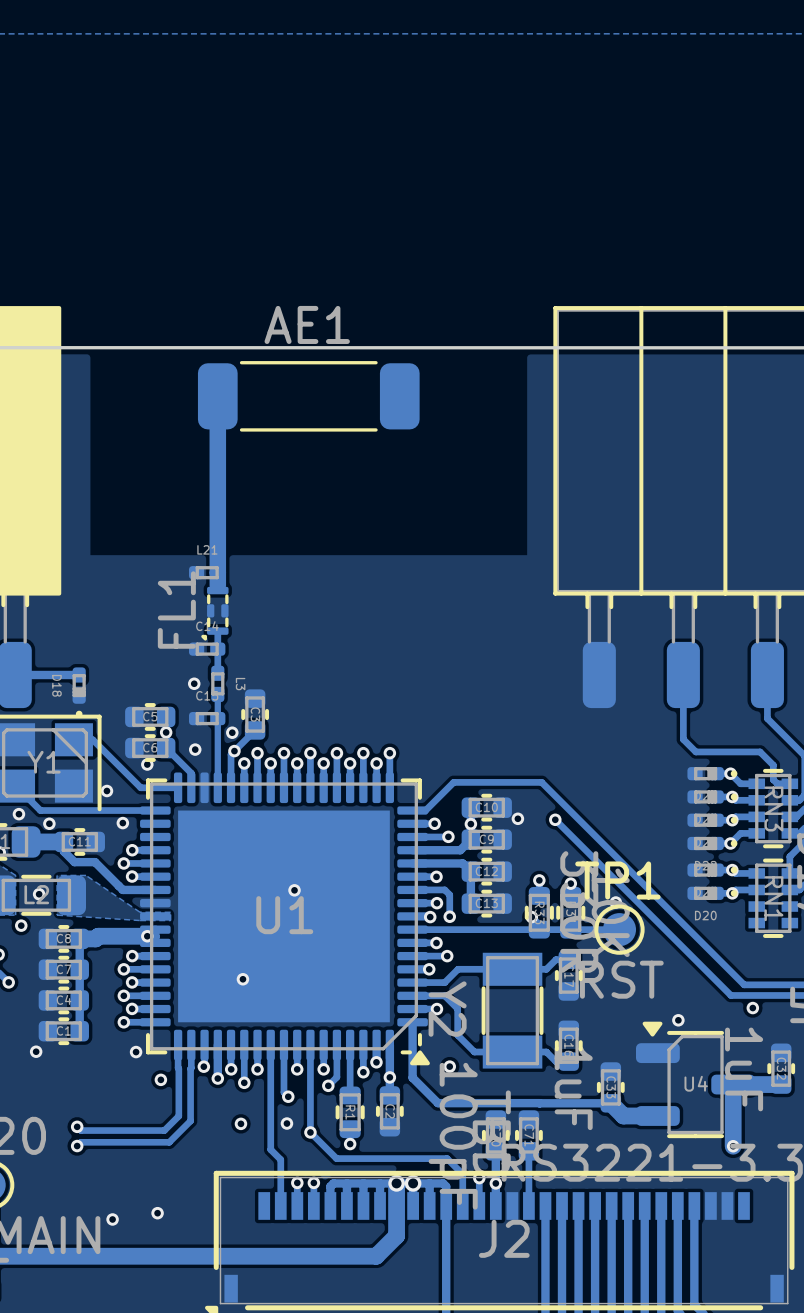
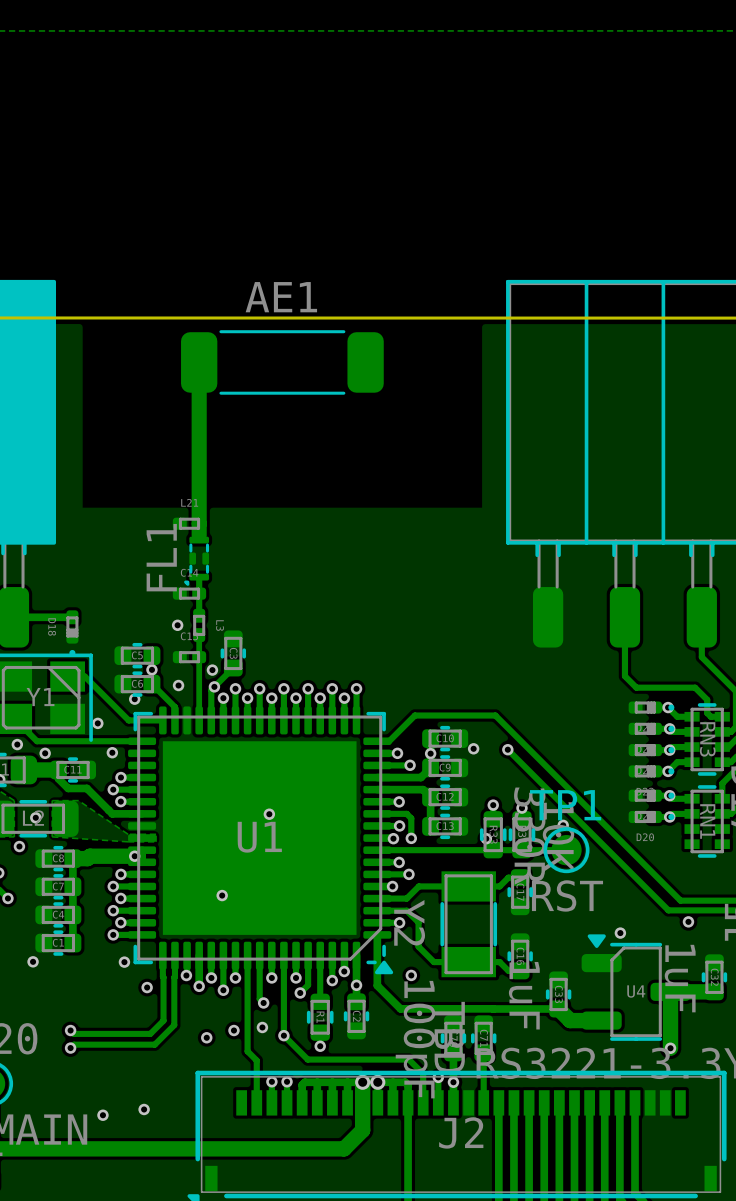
via: (240, 1123) -> none
via: none -> (233, 1030)
via: none -> (206, 1037)

